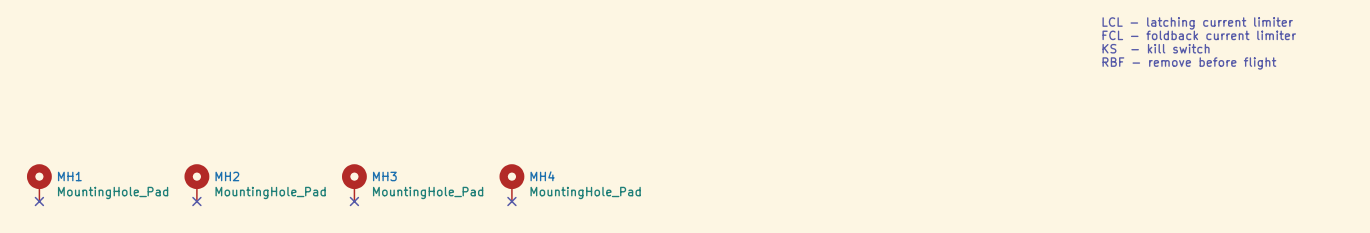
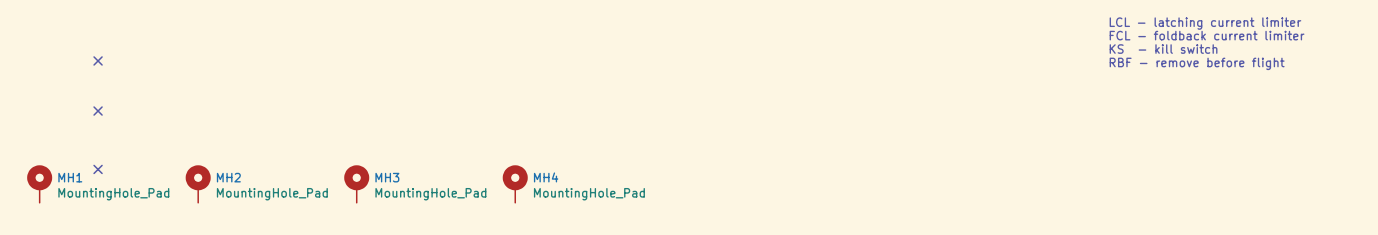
no-connect mark: none -> (98, 60)
no-connect mark: none -> (98, 111)
no-connect mark: none -> (98, 169)
no-connect mark: (39, 201) -> none
no-connect mark: (196, 201) -> none
no-connect mark: (354, 201) -> none
no-connect mark: (511, 201) -> none

